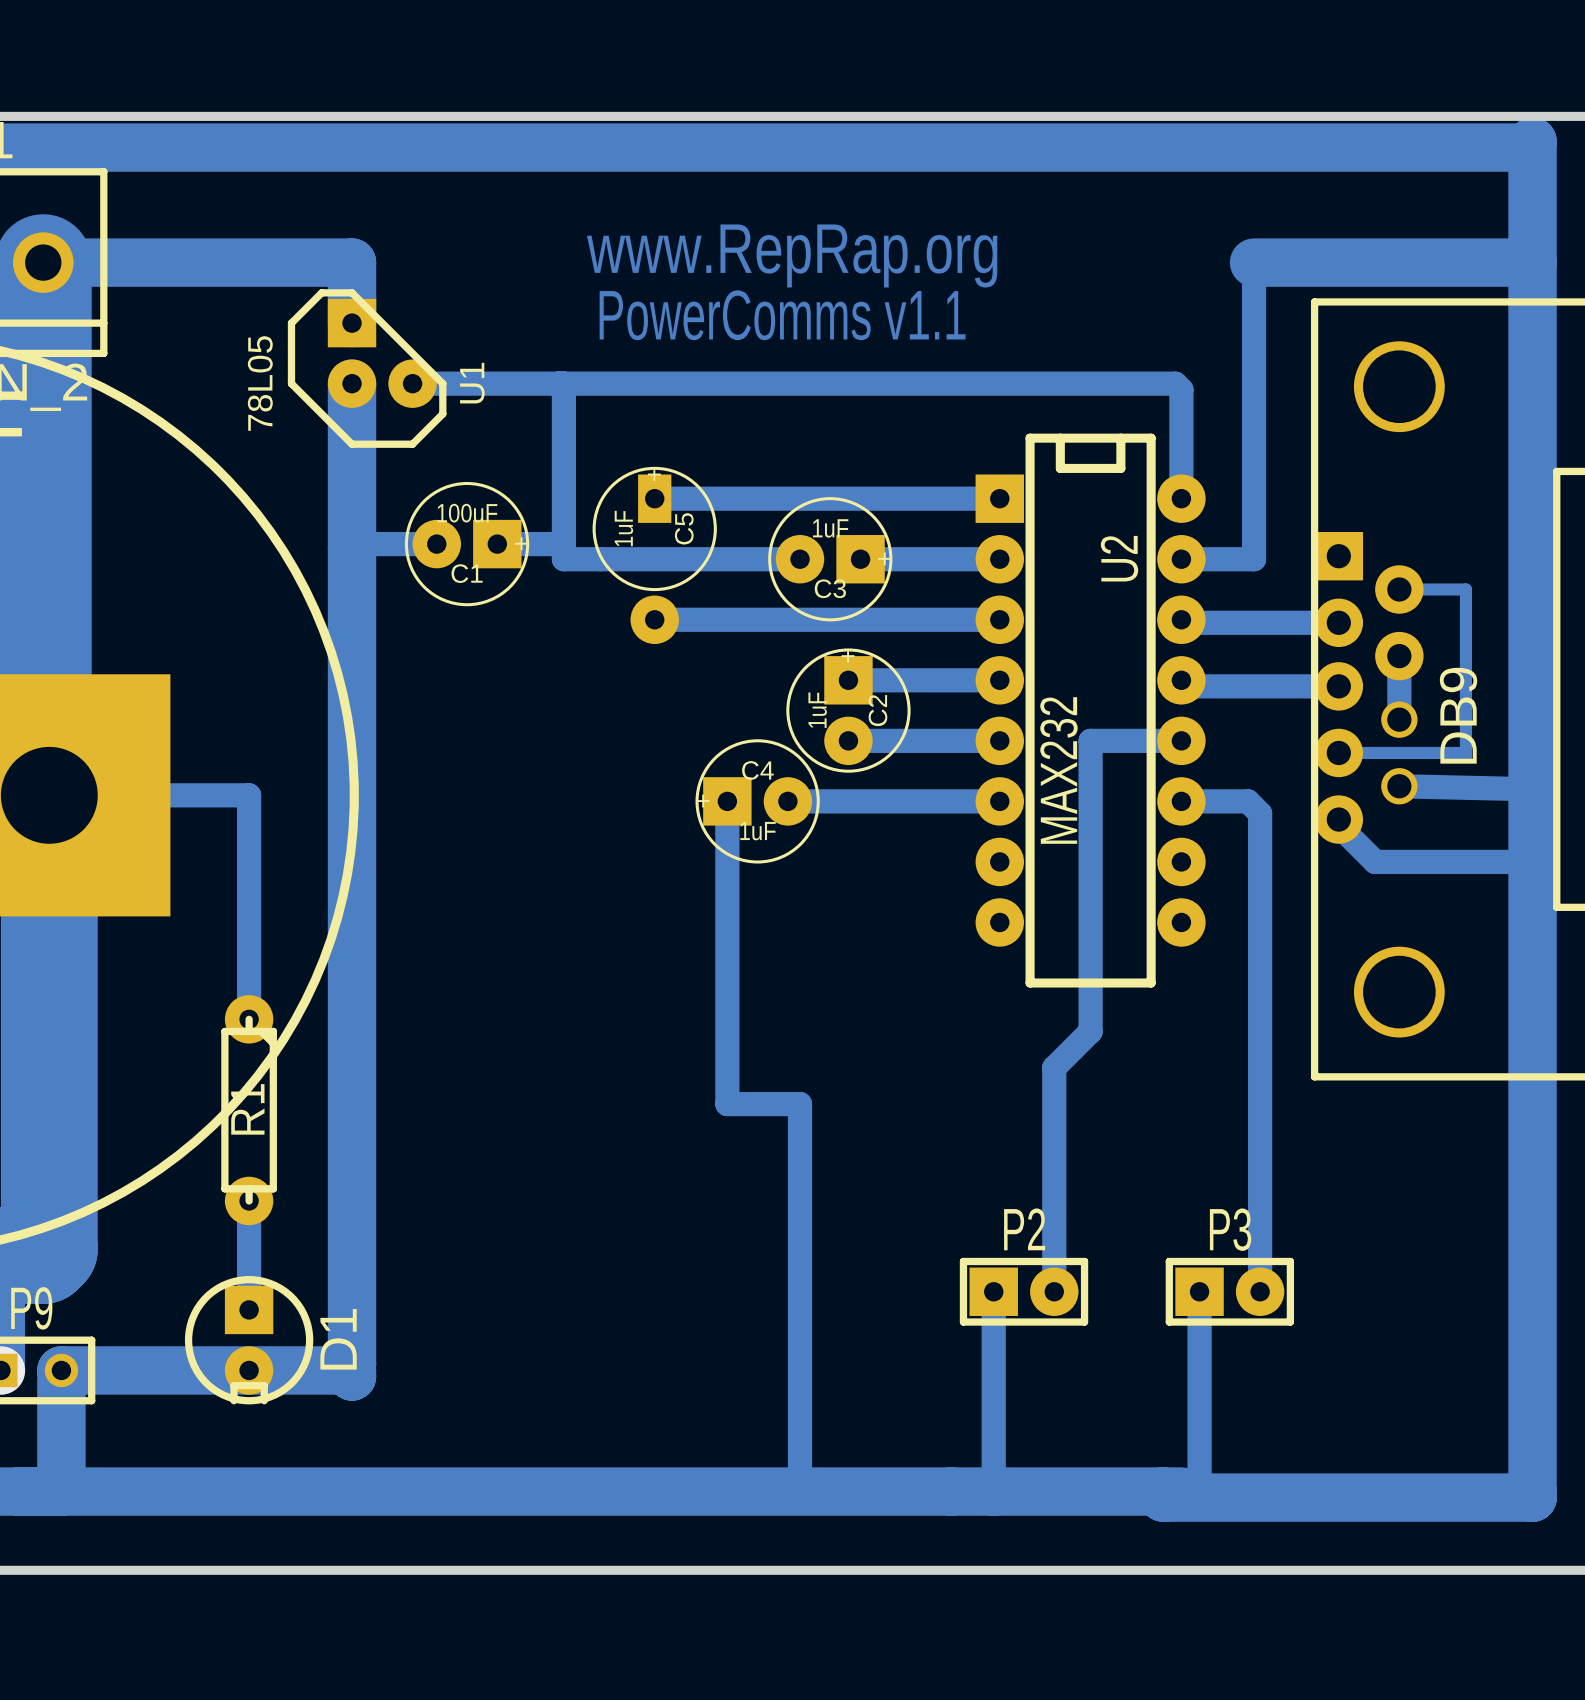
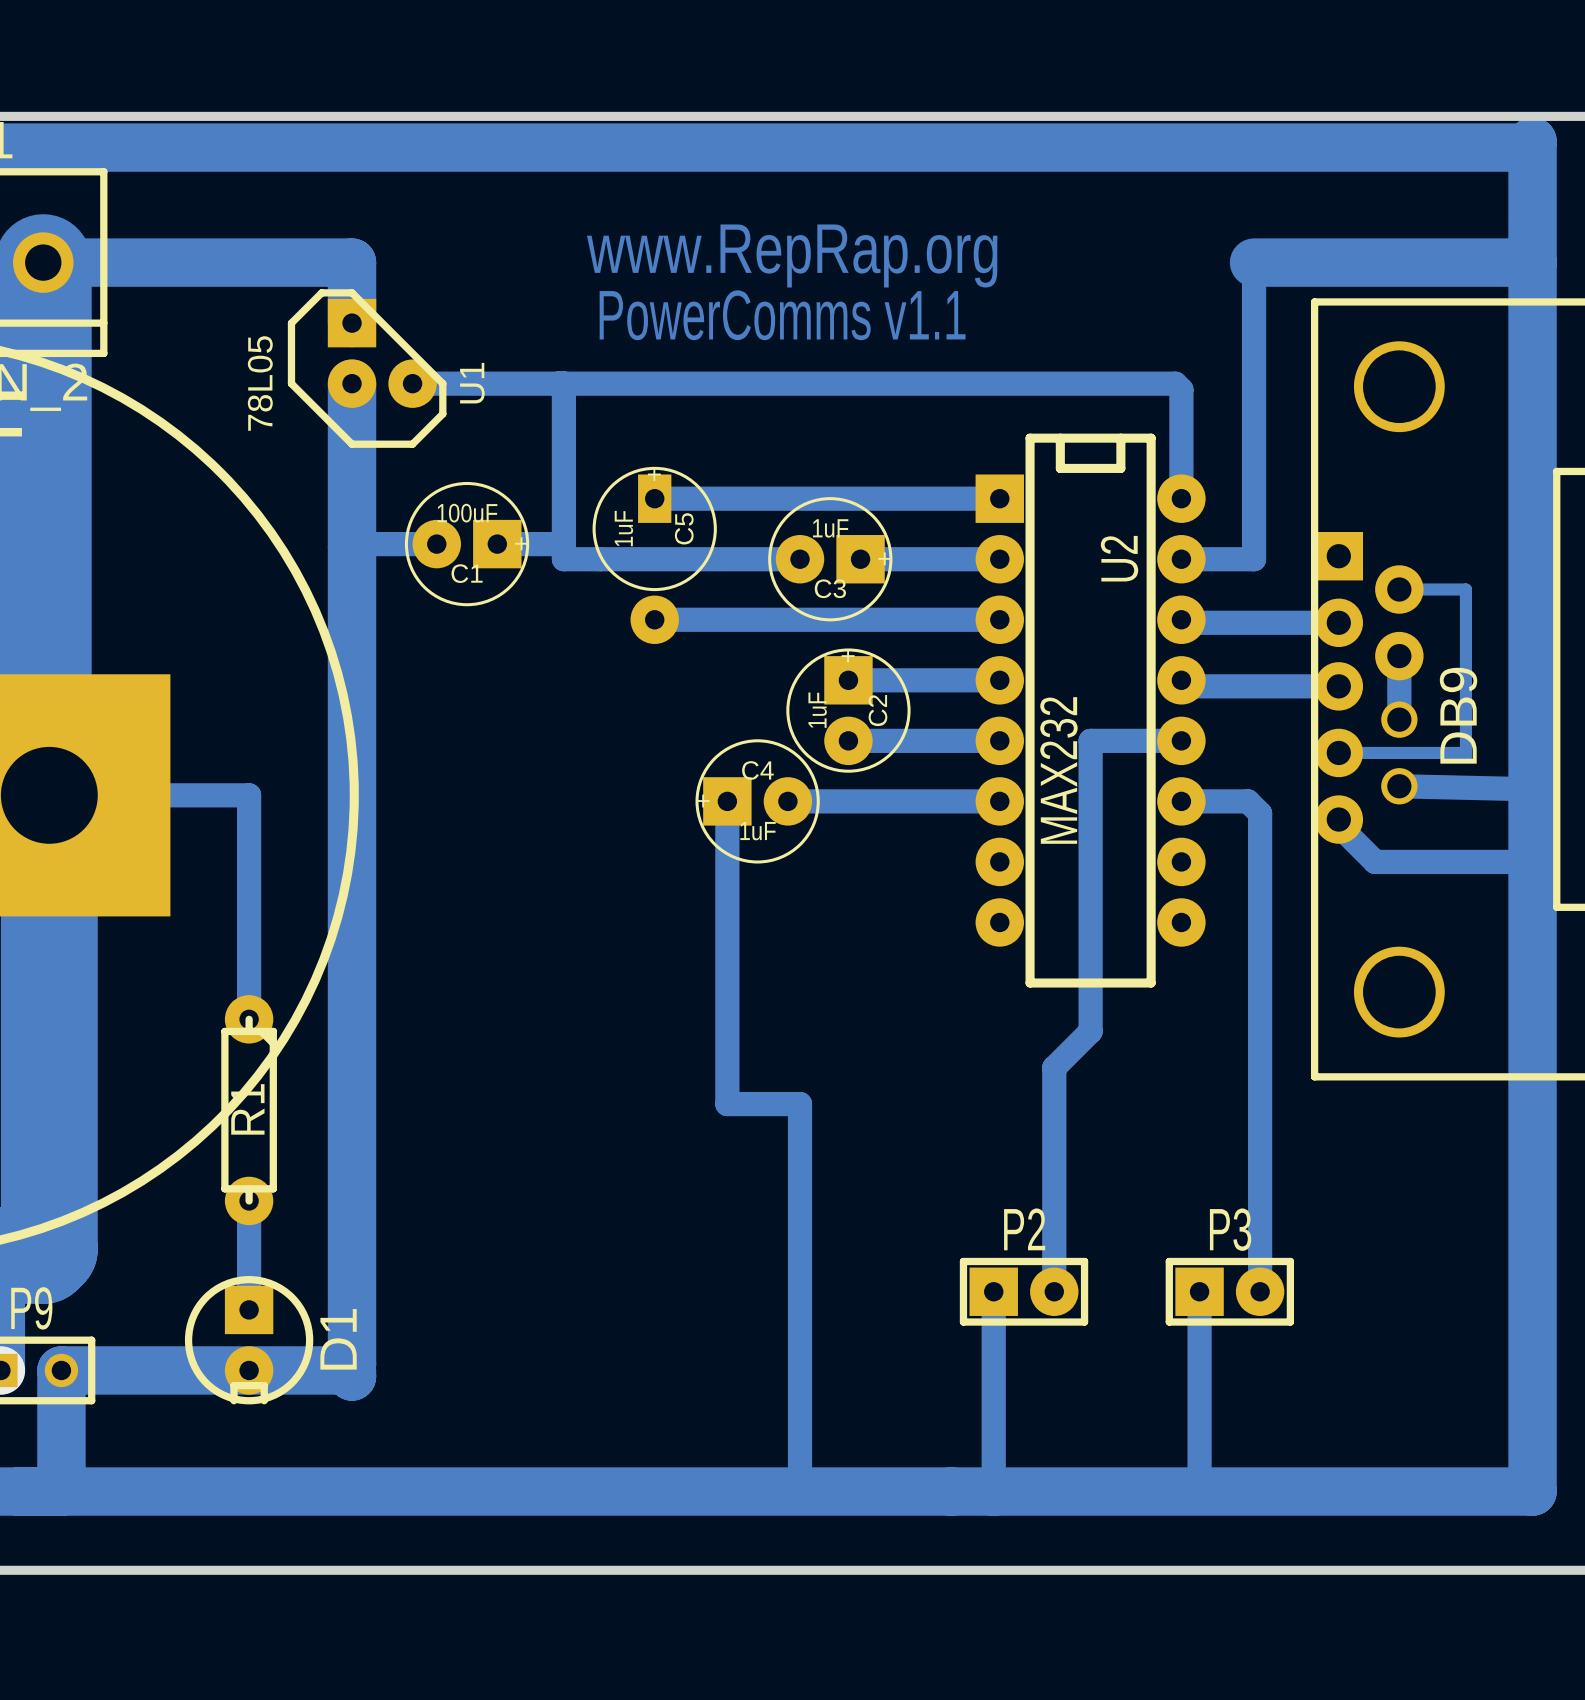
bottom track: (1163, 1491) (1163, 1497) (1532, 1497) (1532, 1491) -> (1181, 1491) (1532, 1491)

